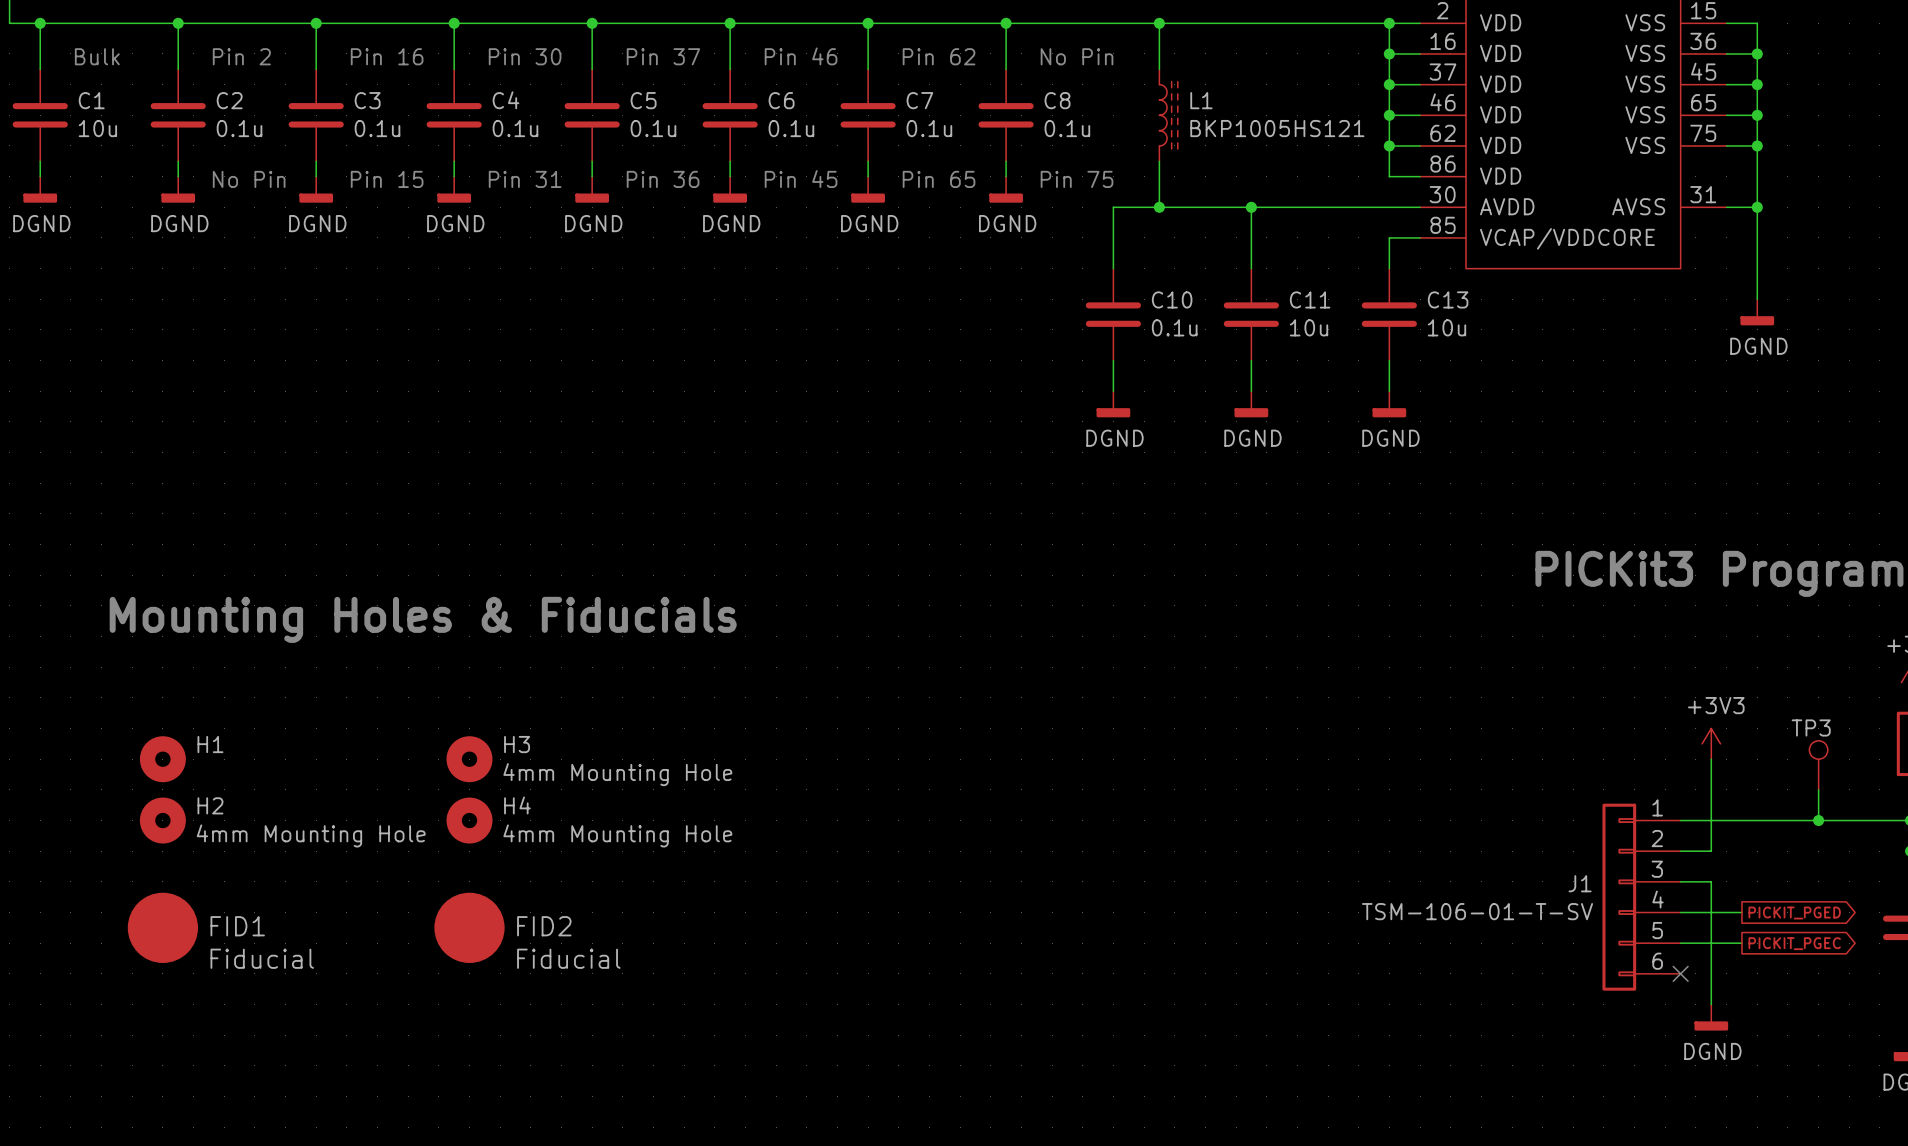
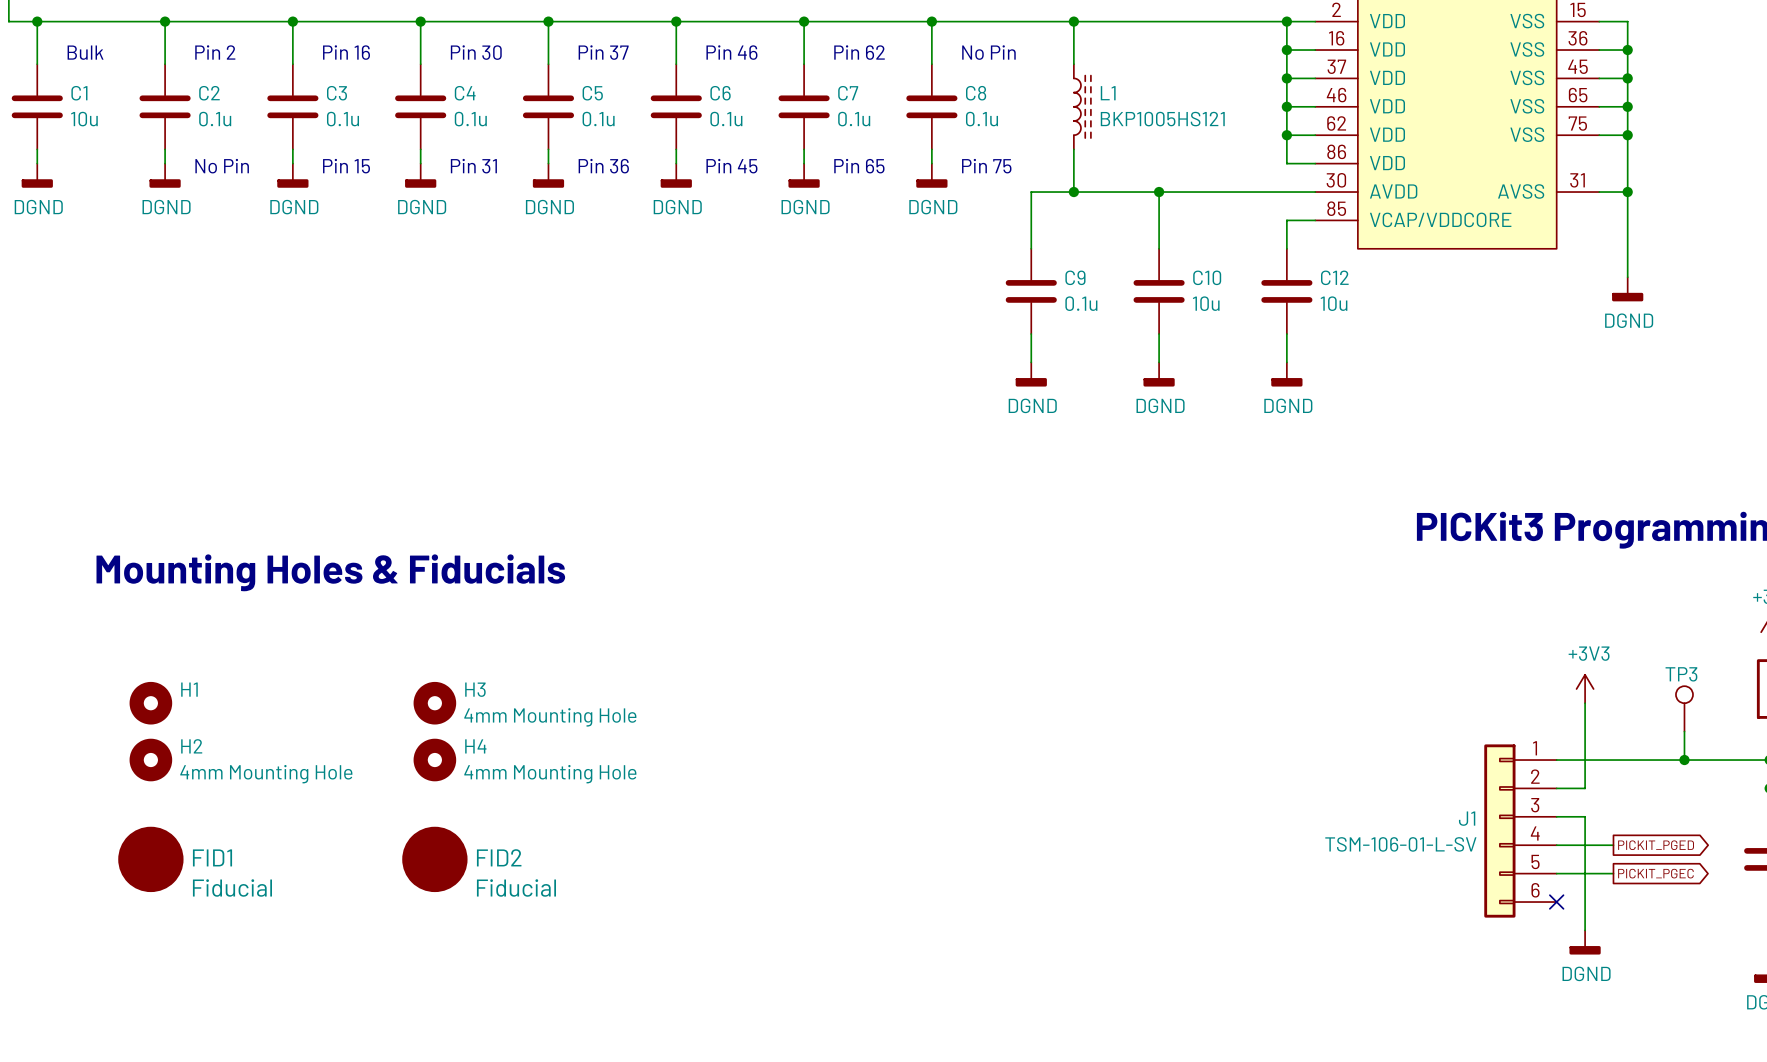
C10 name: C10 (1172, 299) -> C9 (1075, 277)
C11 name: C11 (1310, 299) -> C10 (1207, 277)
C13 name: C13 (1448, 299) -> C12 (1334, 277)
J1 value: TSM-106-01-T-SV (1477, 911) -> TSM-106-01-L-SV (1400, 844)

